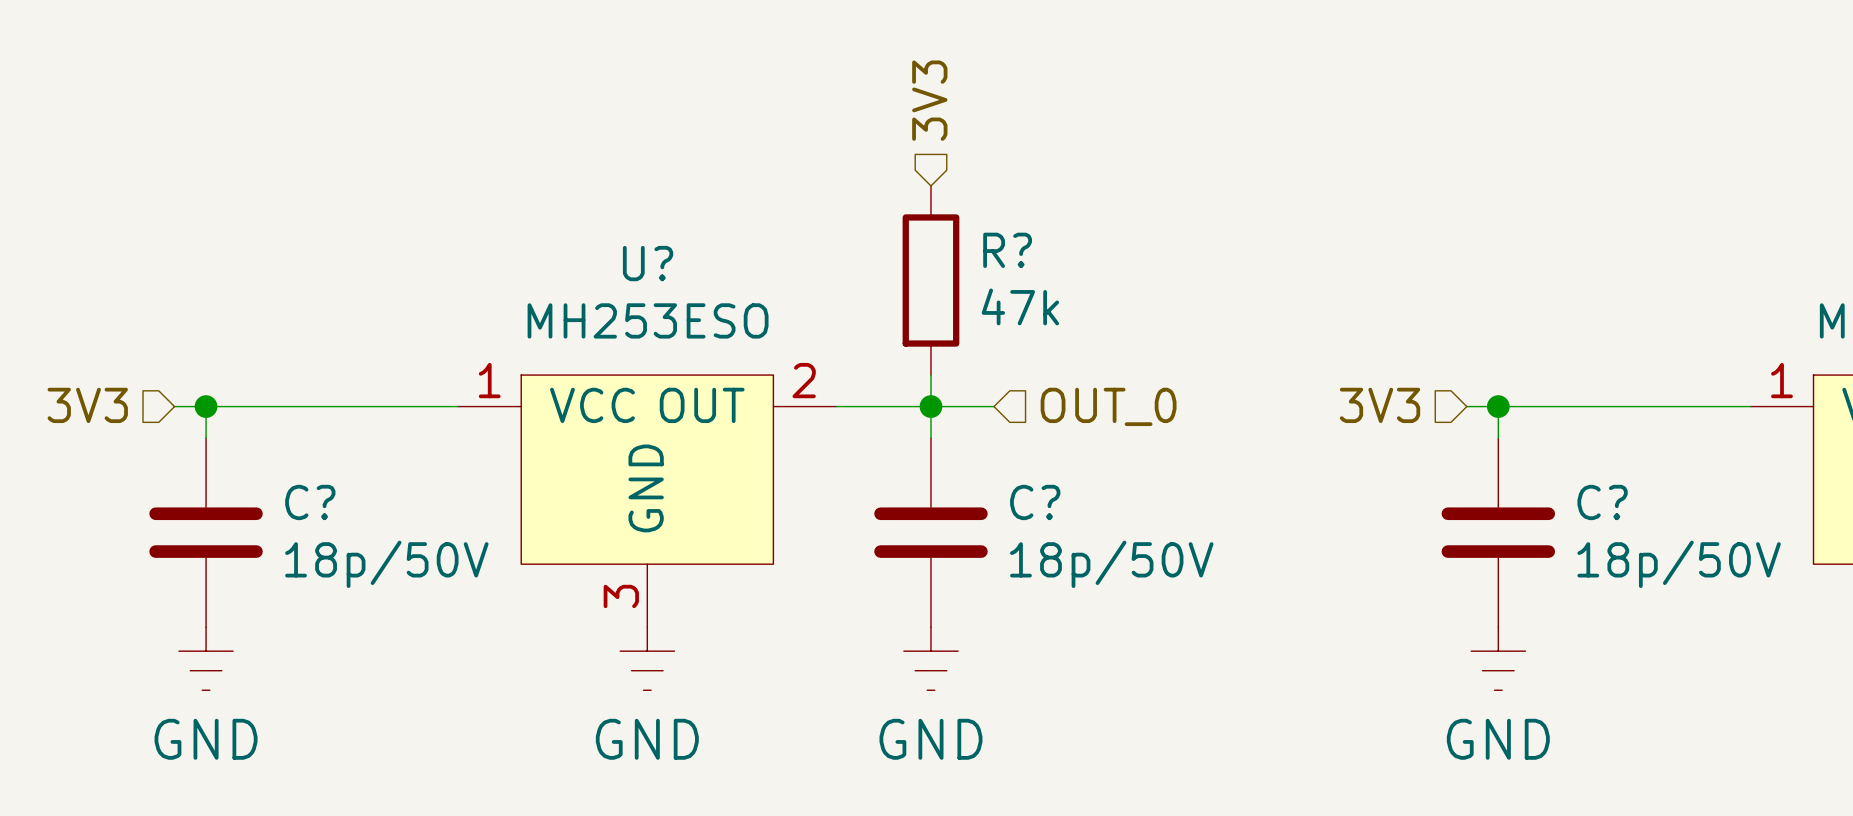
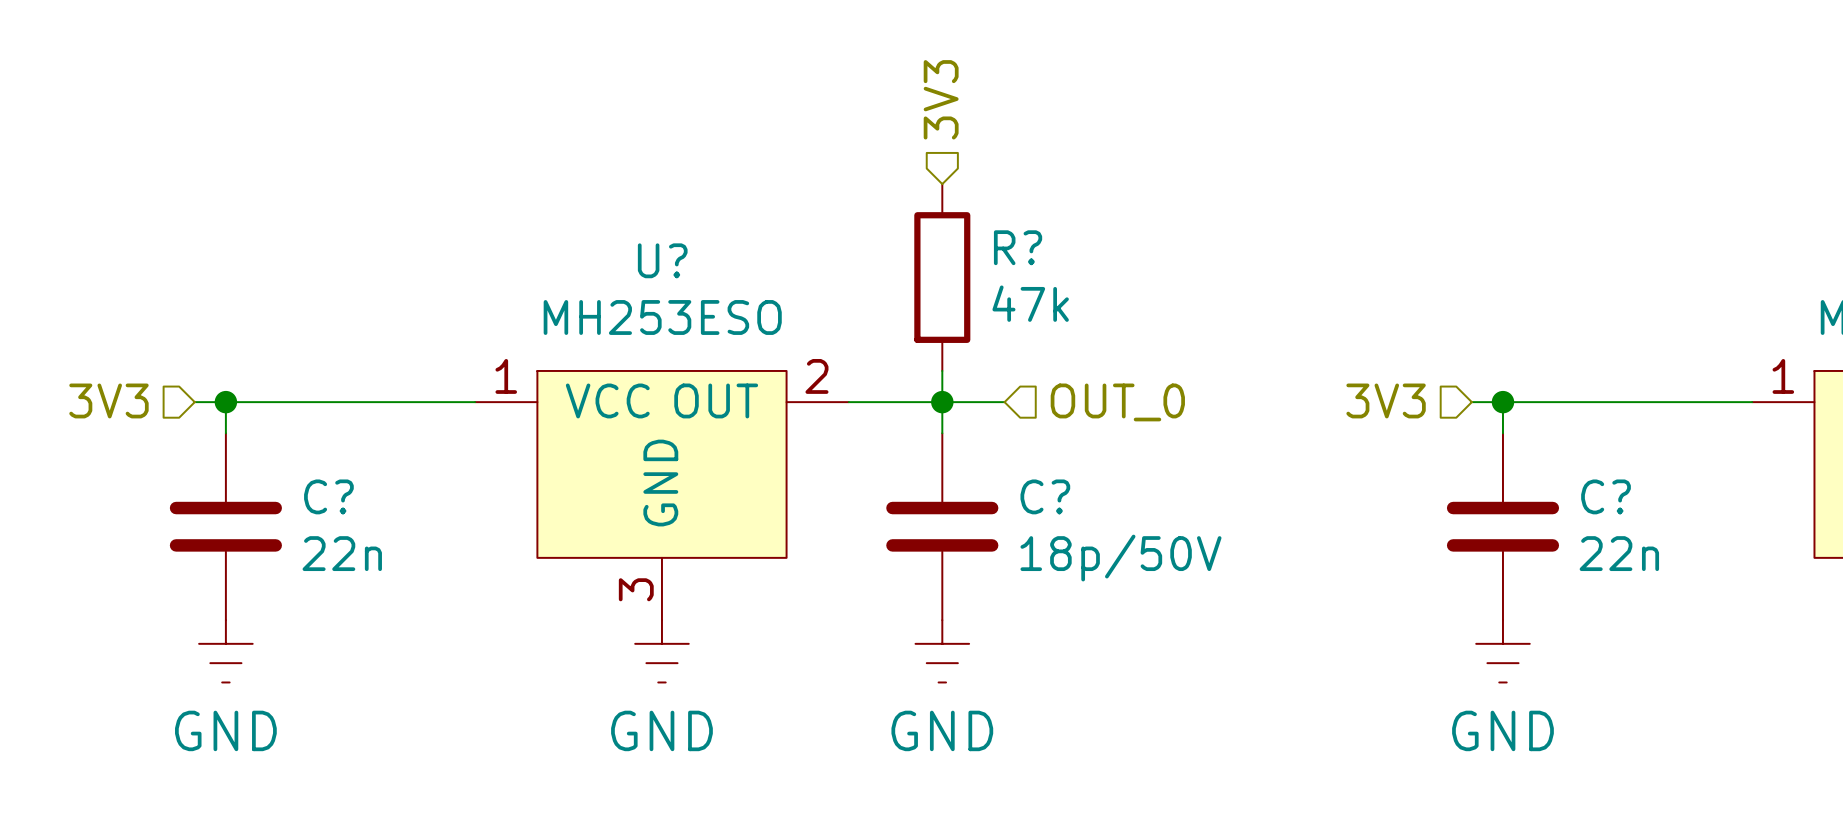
C? value: 18p/50V (386, 564) -> 22n (342, 553)
C? value: 18p/50V (1679, 564) -> 22n (1619, 553)

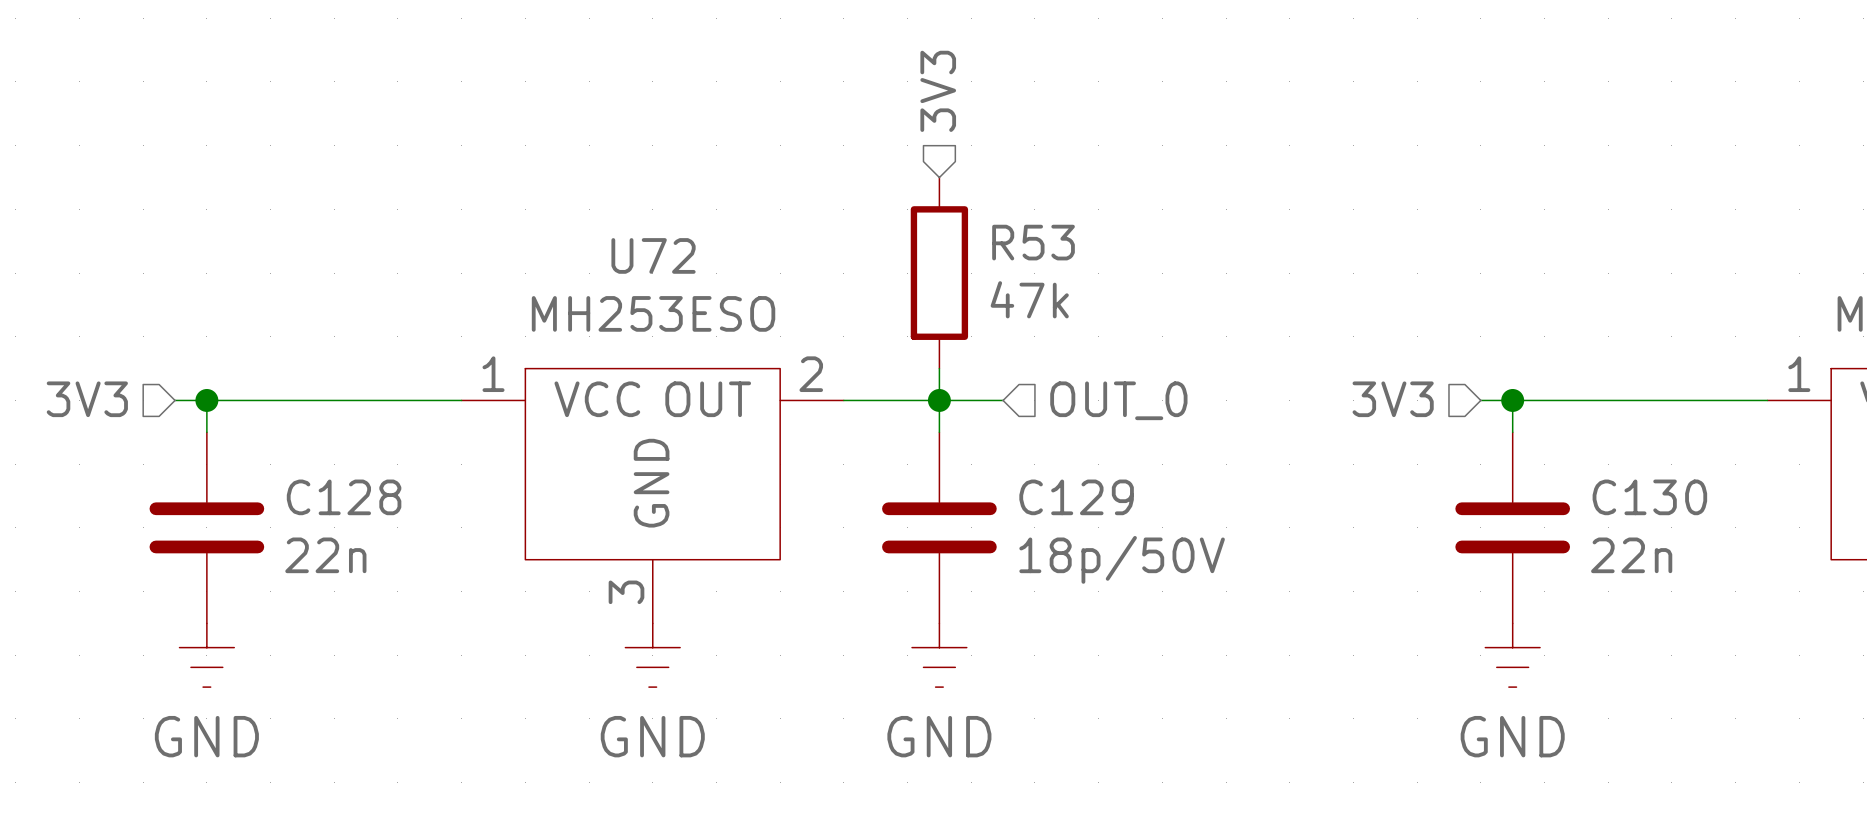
R? name: R? (1018, 247) -> R53 (1033, 242)
U? name: U? (662, 260) -> U72 (653, 255)
C? name: C? (328, 496) -> C128 (344, 497)
C? name: C? (1045, 496) -> C129 (1076, 497)
C? name: C? (1606, 496) -> C130 (1649, 497)

